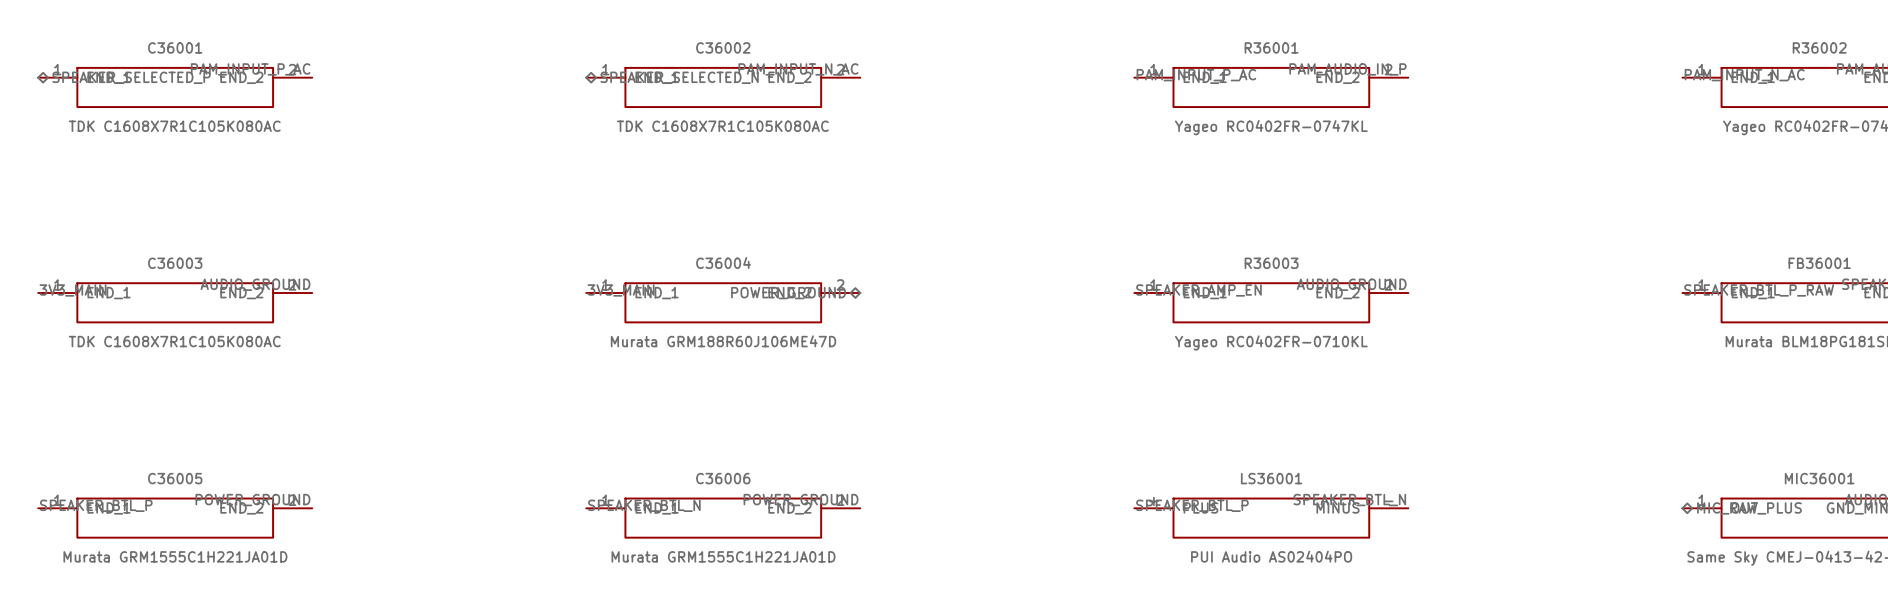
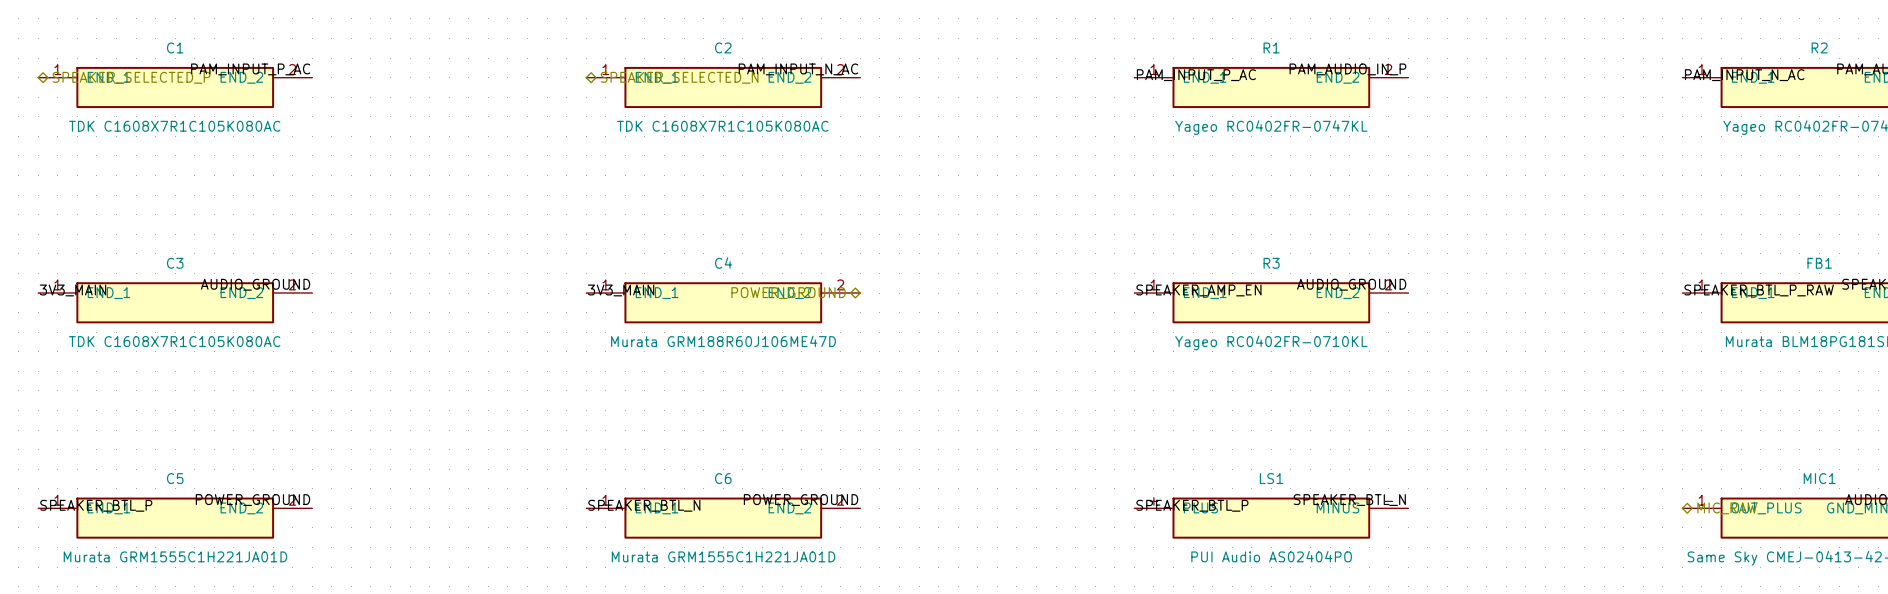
C36001 name: C36001 (175, 47) -> C1 (175, 47)
C36002 name: C36002 (723, 47) -> C2 (723, 47)
R36001 name: R36001 (1271, 47) -> R1 (1271, 47)
R36002 name: R36002 (1819, 47) -> R2 (1819, 47)
C36003 name: C36003 (175, 263) -> C3 (175, 263)
C36004 name: C36004 (723, 263) -> C4 (723, 263)
R36003 name: R36003 (1271, 263) -> R3 (1271, 263)
FB36001 name: FB36001 (1819, 263) -> FB1 (1819, 263)
C36005 name: C36005 (175, 478) -> C5 (175, 478)
C36006 name: C36006 (723, 478) -> C6 (723, 478)
LS36001 name: LS36001 (1271, 478) -> LS1 (1271, 478)
MIC36001 name: MIC36001 (1819, 478) -> MIC1 (1819, 478)

